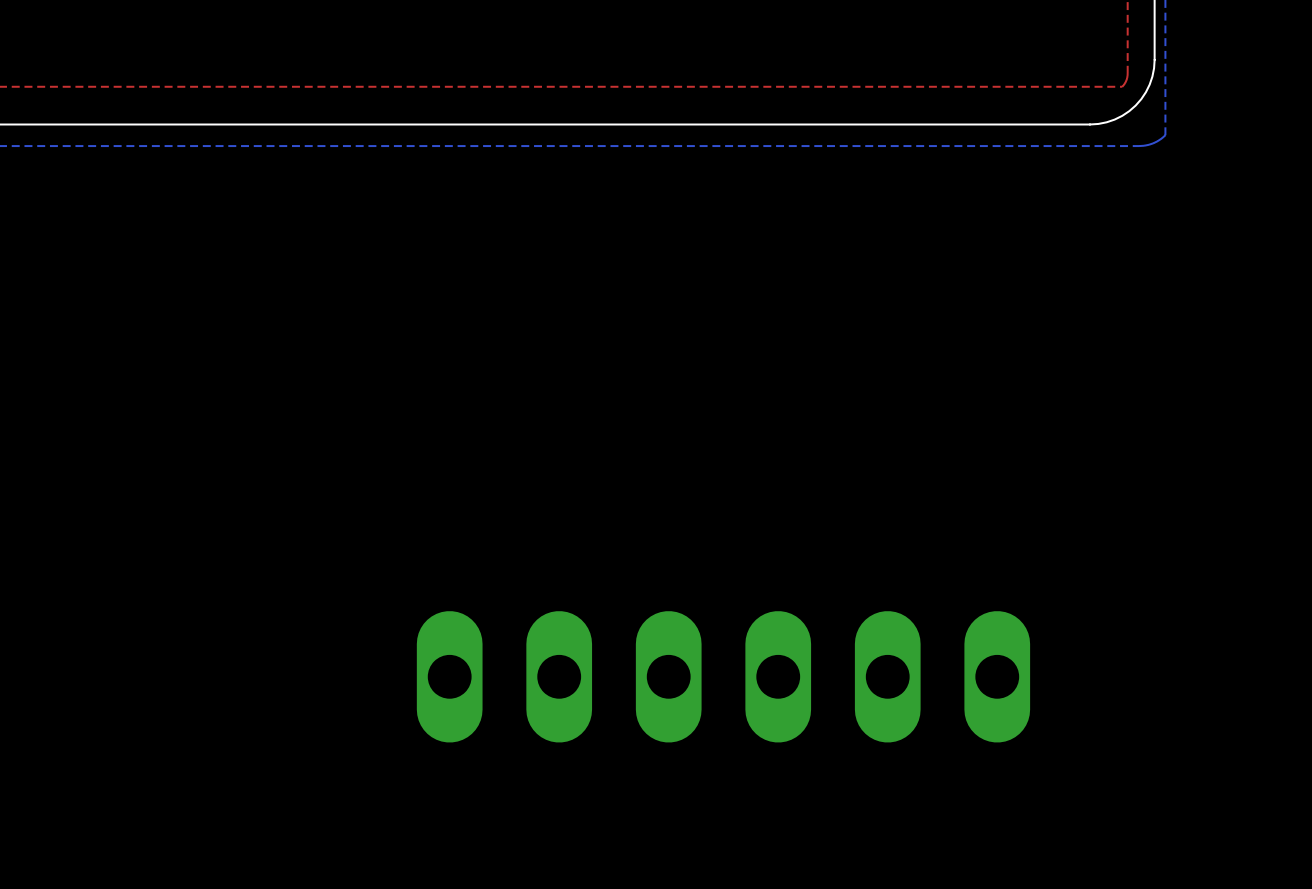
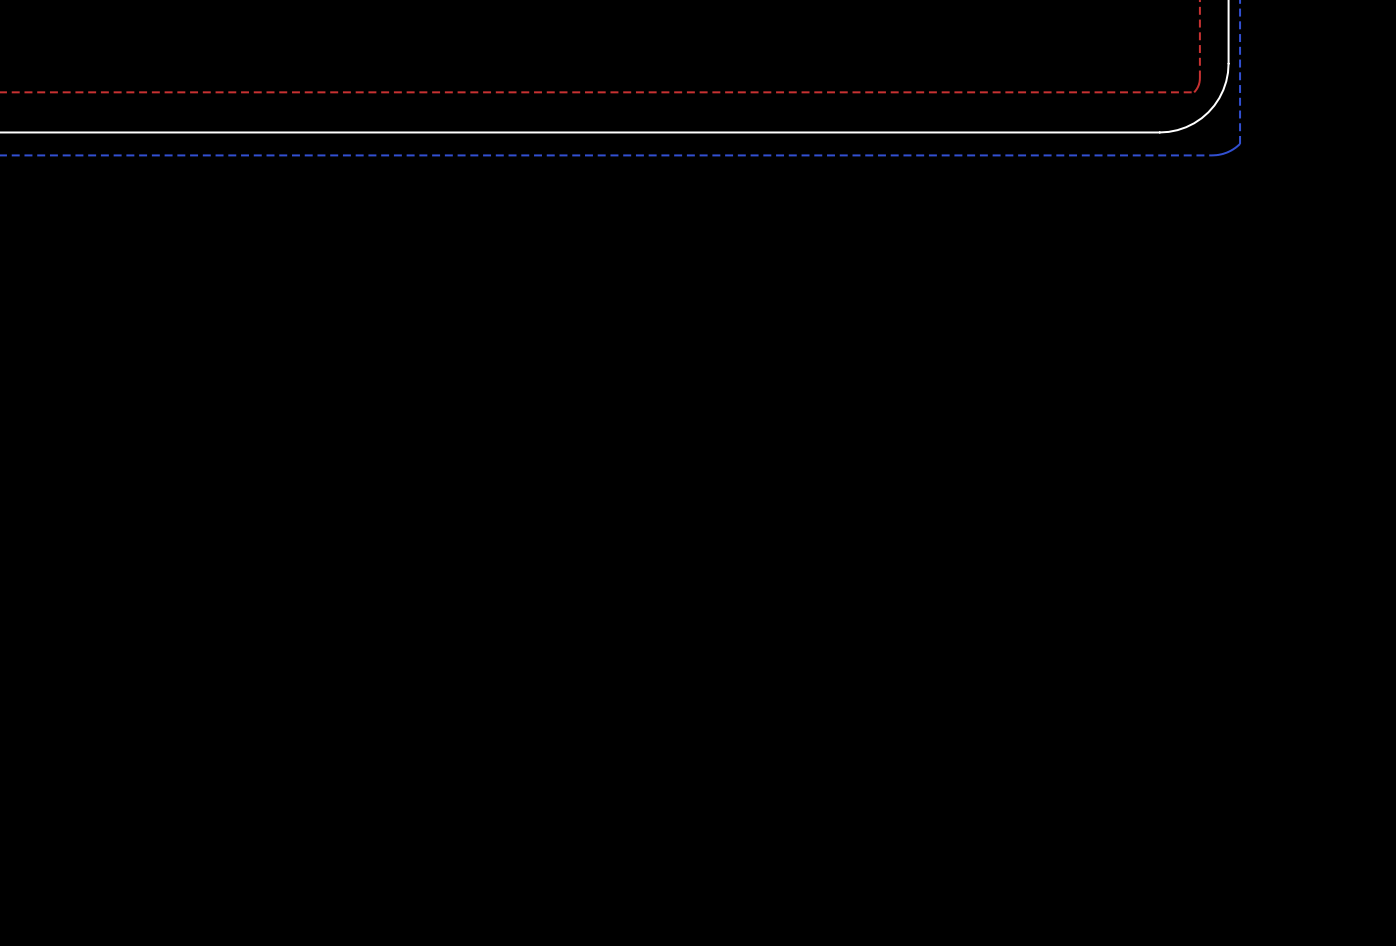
part: (723, 676) -> none

